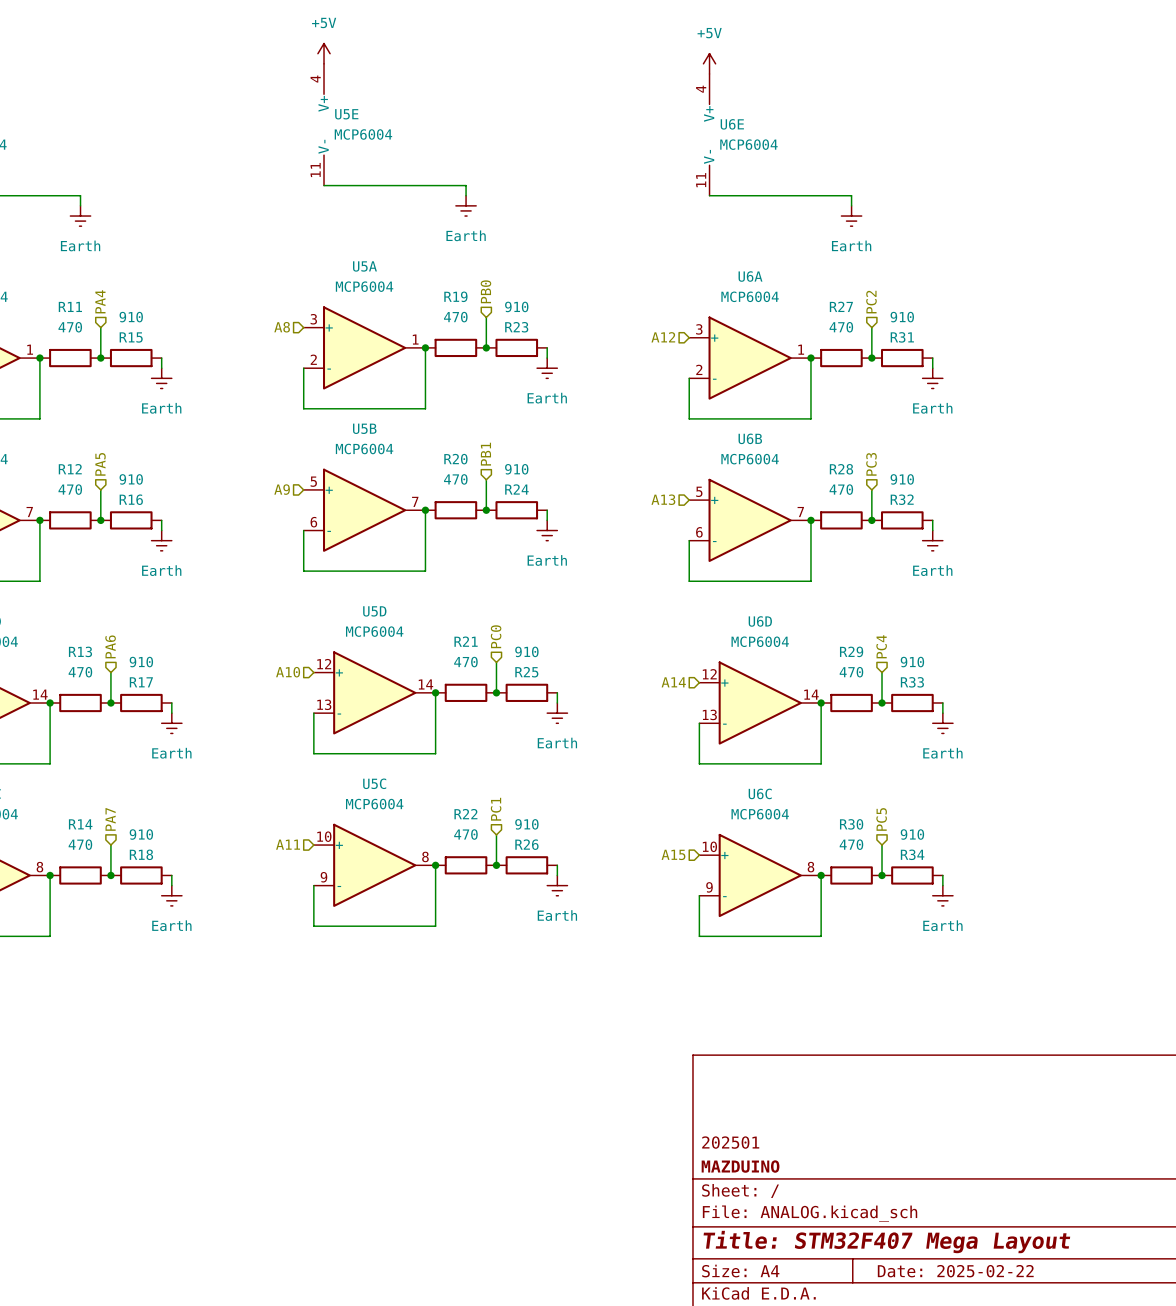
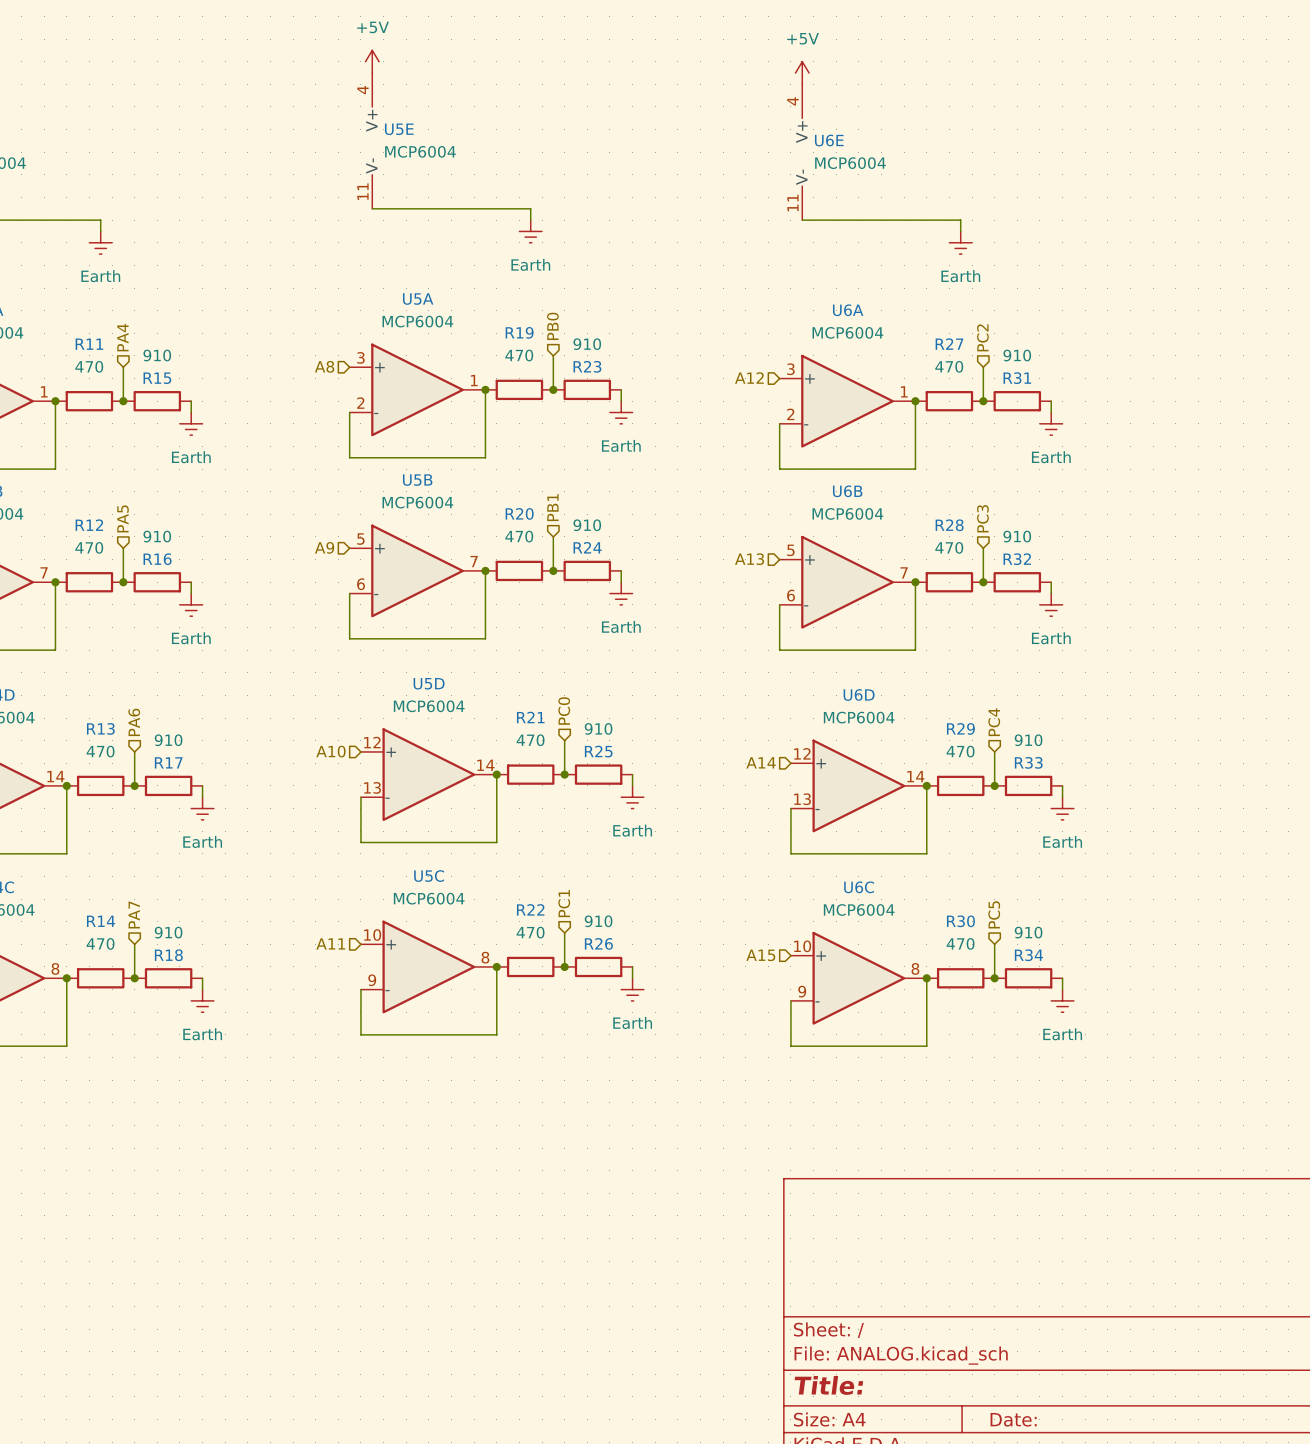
title block: 202501 (730, 1142) -> none
title block: MAZDUINO (740, 1166) -> none
title block: Title: STM32F407 Mega Layout (886, 1242) -> Title: (828, 1385)
title block: Date: 2025-02-22 (955, 1271) -> Date: (1013, 1419)

